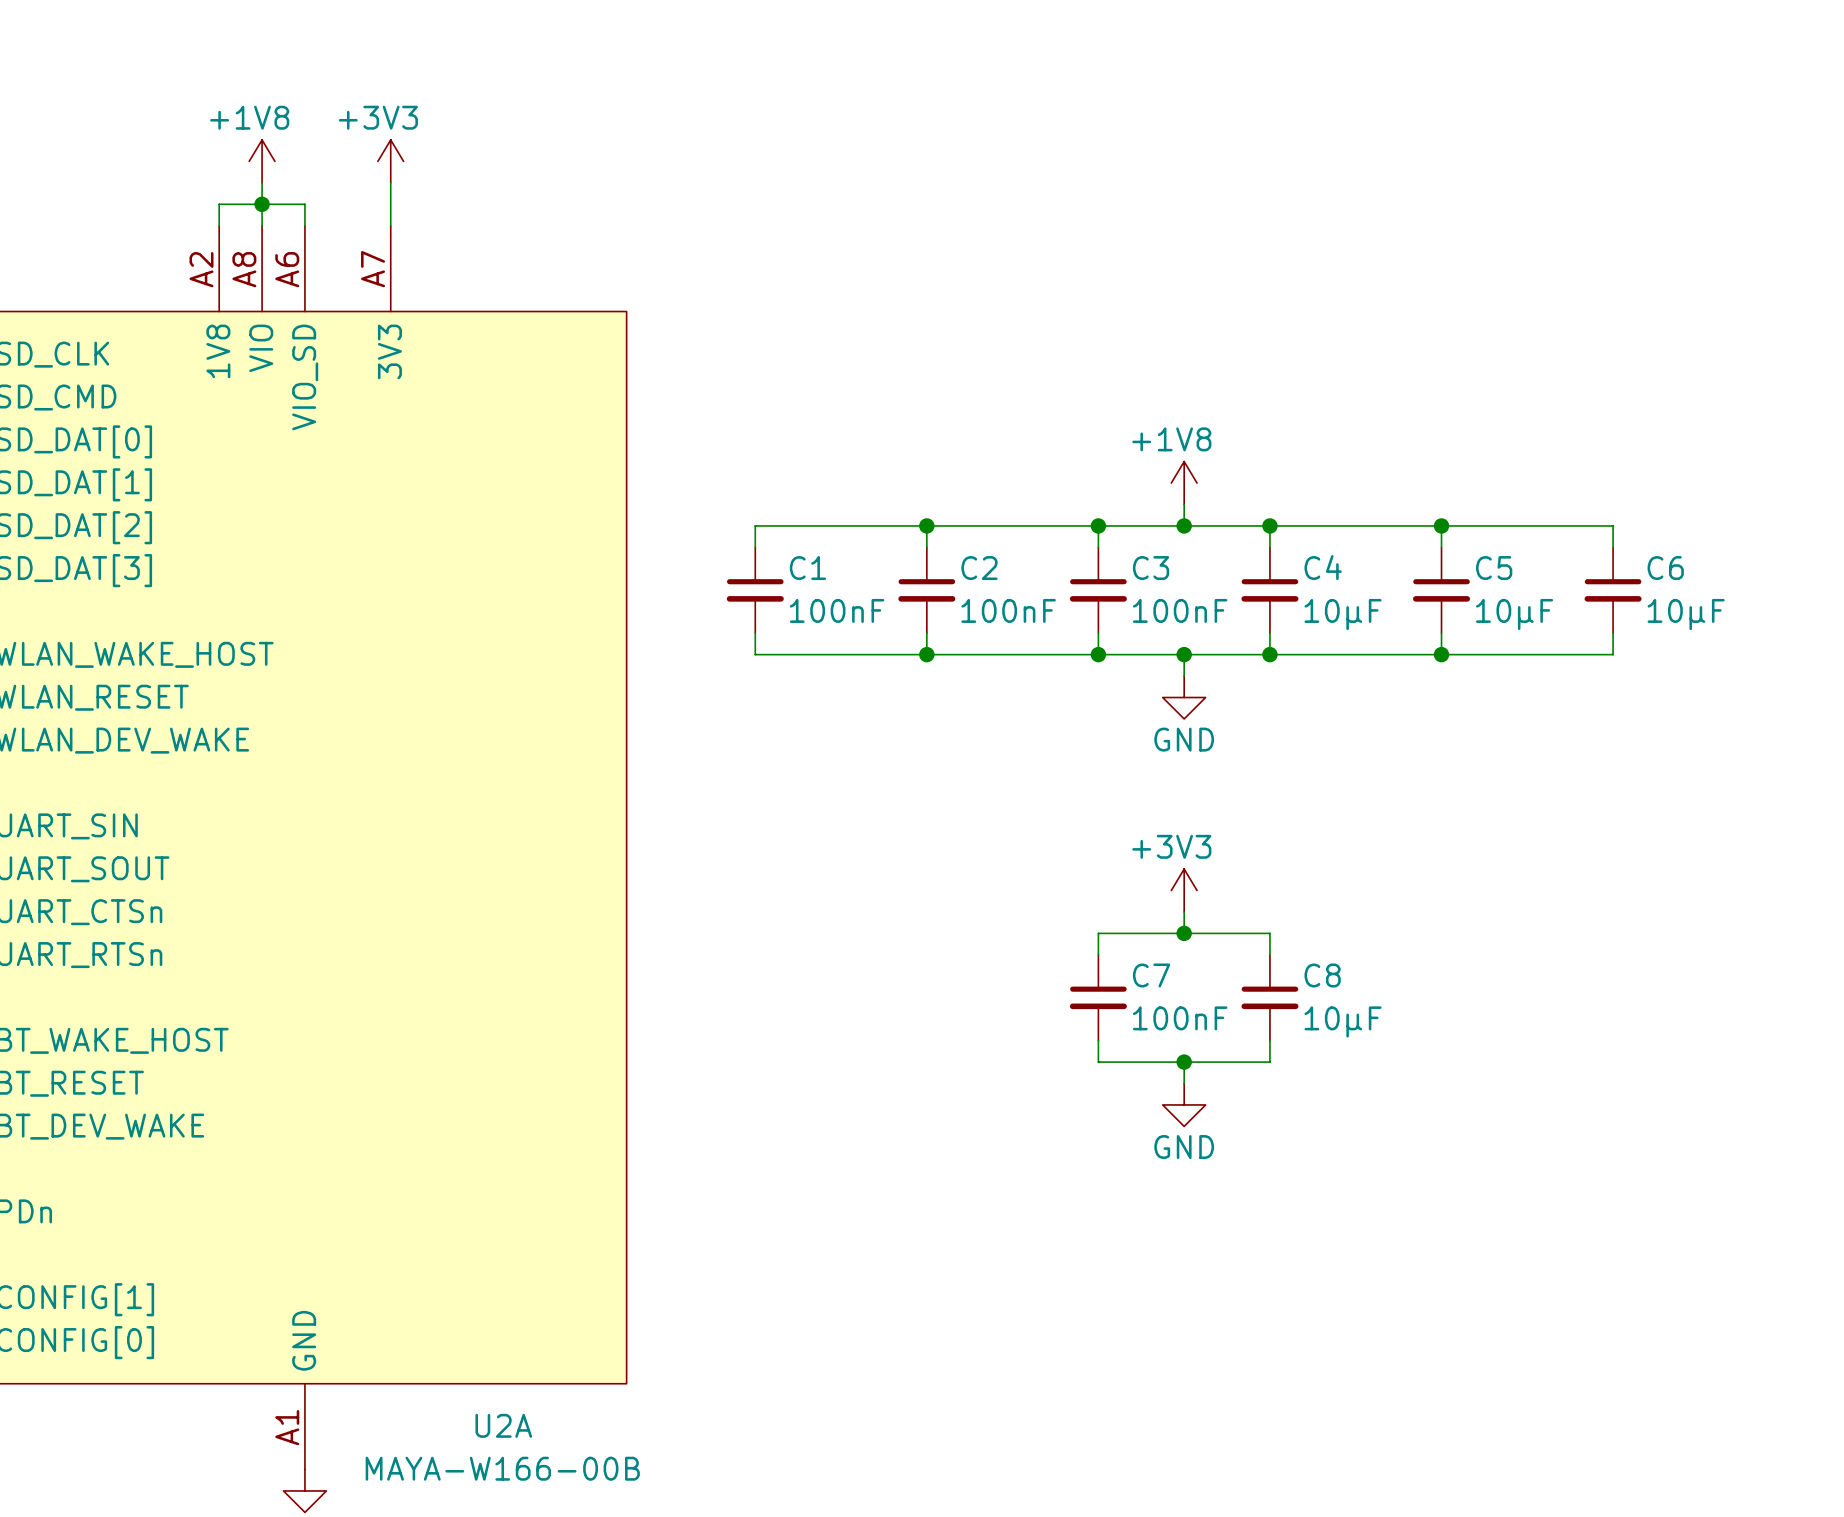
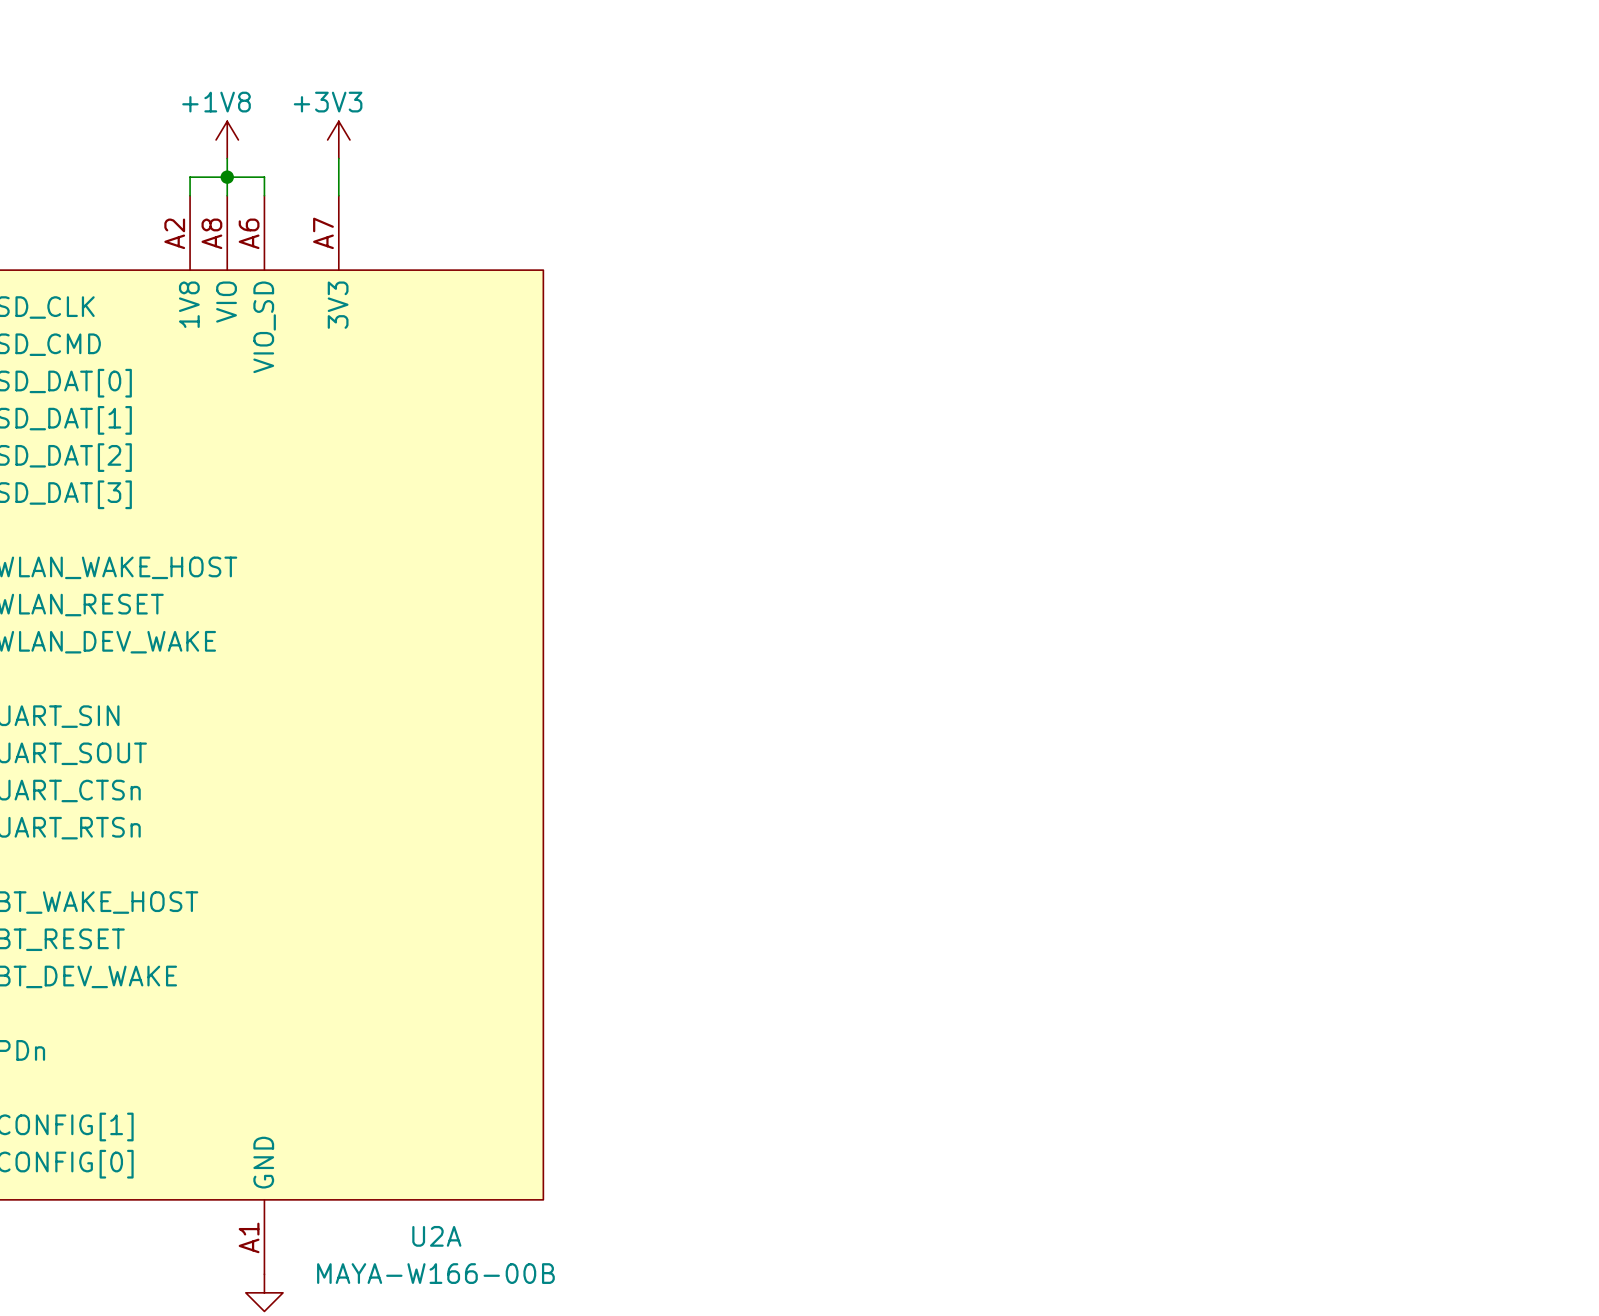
power symbol: +1V8 (1184, 483) -> none
wire: (1184, 504) (1184, 525) -> none
wire: (926, 525) (926, 547) -> none
junction: (926, 525) -> none
wire: (1098, 525) (1098, 547) -> none
junction: (1098, 525) -> none
junction: (1184, 525) -> none
wire: (1269, 525) (1269, 547) -> none
junction: (1269, 525) -> none
wire: (1441, 525) (1441, 547) -> none
junction: (1441, 525) -> none
wire: (755, 547) (755, 525) (1613, 525) (1613, 547) -> none
C1: 100nF (755, 590) -> none
C2: 100nF (926, 590) -> none
C3: 100nF (1098, 590) -> none
C4: 10μF (1269, 590) -> none
C5: 10μF (1441, 590) -> none
C6: 10μF (1613, 590) -> none
wire: (755, 633) (755, 654) (1613, 654) (1613, 633) -> none
wire: (926, 633) (926, 654) -> none
wire: (1098, 633) (1098, 654) -> none
wire: (1269, 633) (1269, 654) -> none
wire: (1441, 633) (1441, 654) -> none
junction: (926, 654) -> none
junction: (1098, 654) -> none
wire: (1184, 654) (1184, 676) -> none
junction: (1184, 654) -> none
junction: (1269, 654) -> none
junction: (1441, 654) -> none
power symbol: GND (1184, 697) -> none
power symbol: +3V3 (1184, 890) -> none
wire: (1184, 911) (1184, 933) -> none
junction: (1184, 933) -> none
wire: (1098, 954) (1098, 933) (1269, 933) (1269, 954) -> none
C7: 100nF (1098, 997) -> none
C8: 10μF (1269, 997) -> none
wire: (1098, 1040) (1098, 1062) (1269, 1062) (1269, 1040) -> none
wire: (1184, 1062) (1184, 1083) -> none
junction: (1184, 1062) -> none
power symbol: GND (1184, 1104) -> none

